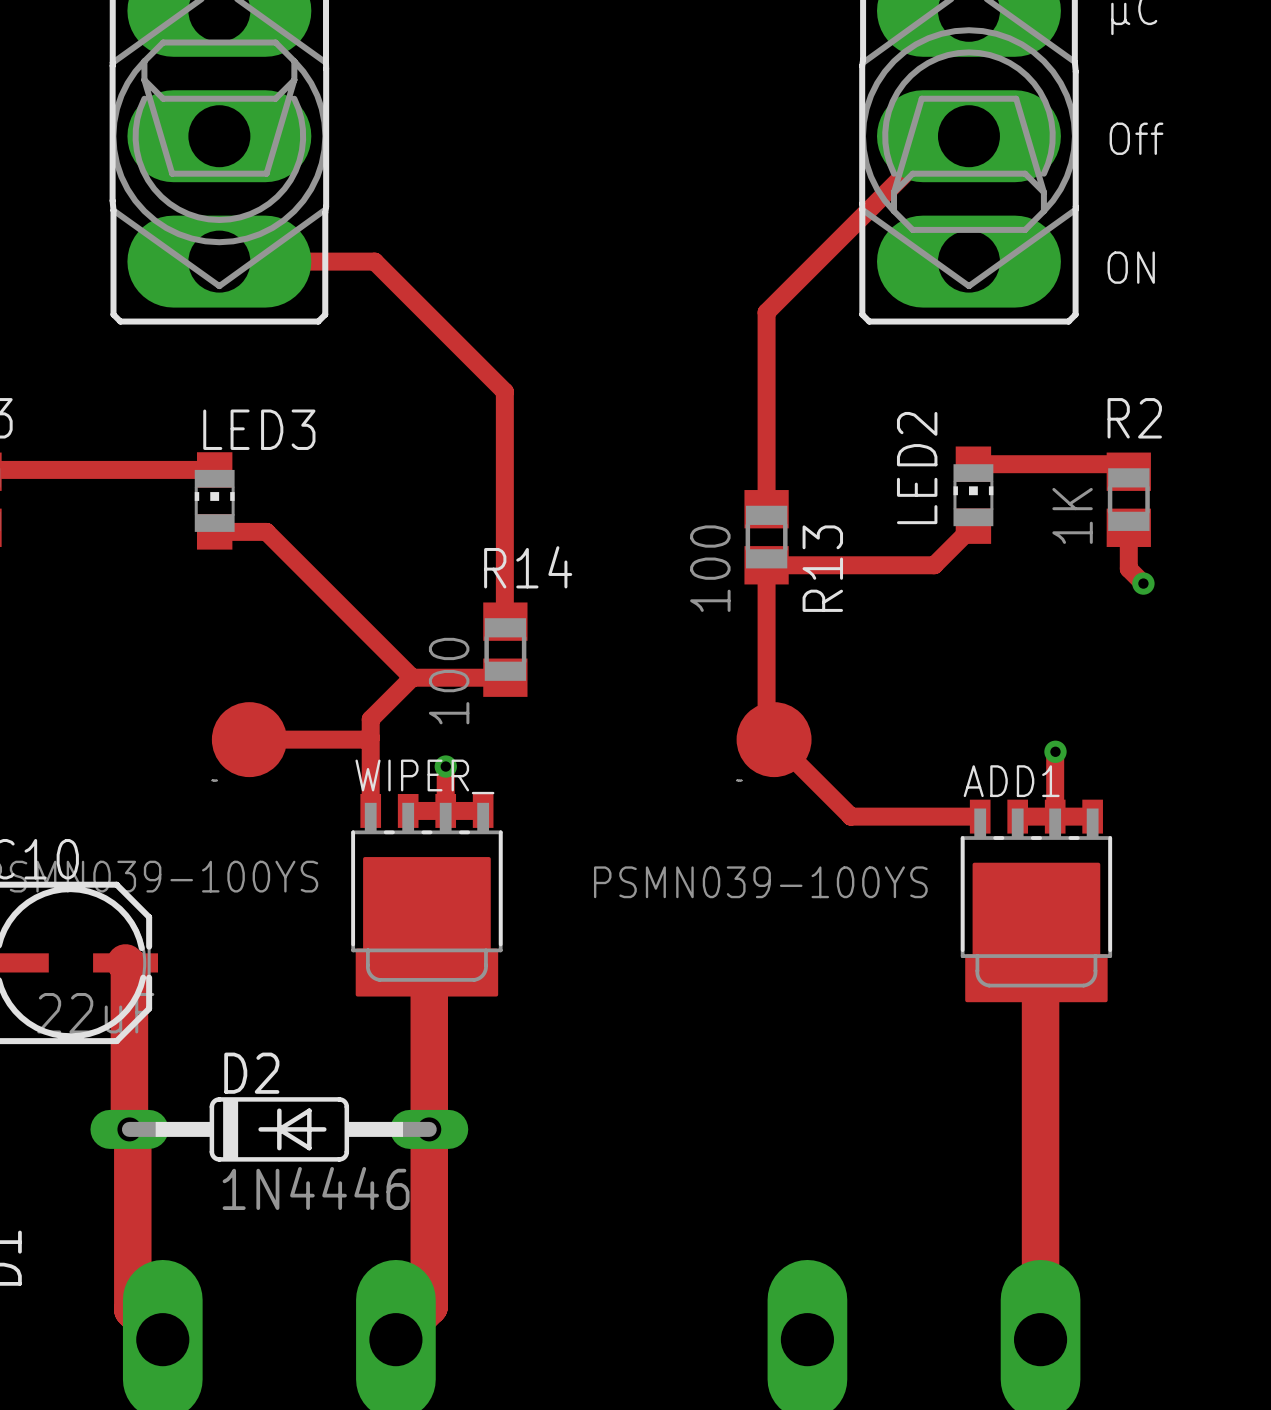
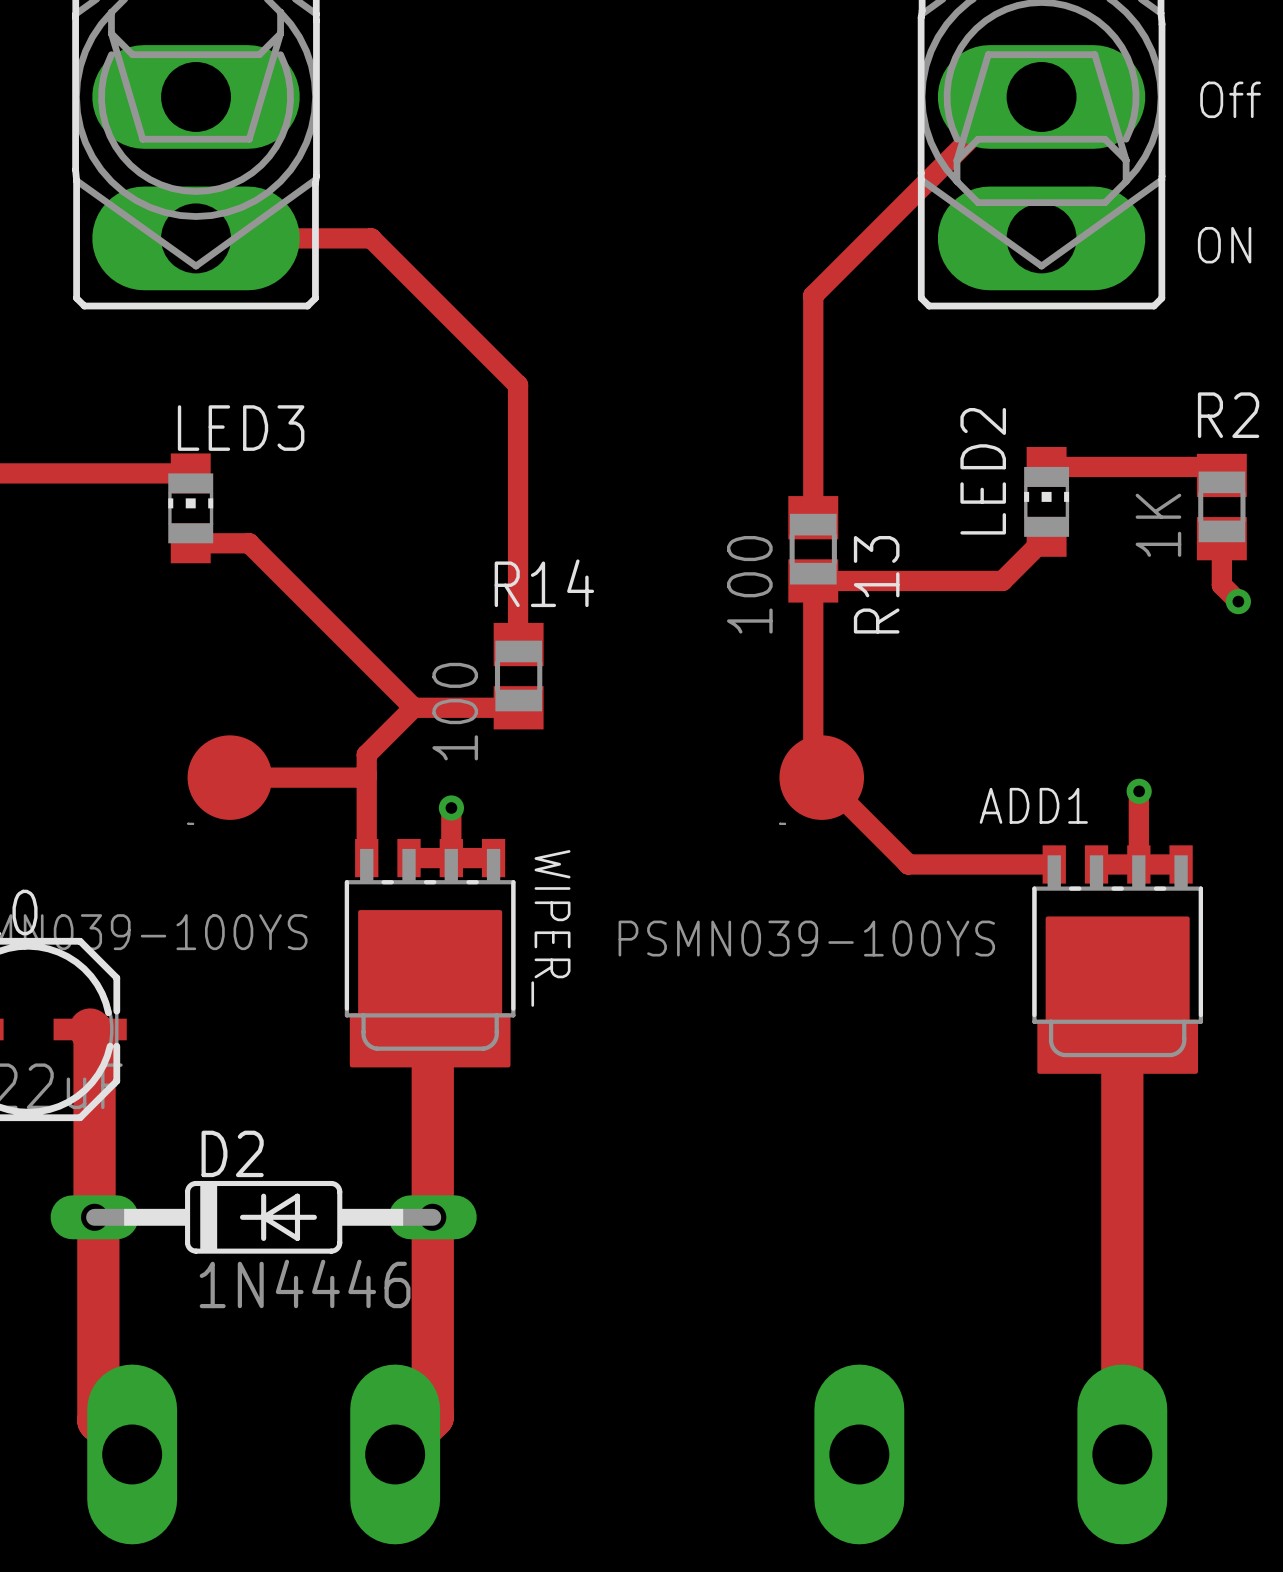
WIPER_ name rotation: 0° (424, 776) -> 90° clockwise (550, 928)
ADD1 name position: ADD1 (1011, 781) -> ADD1 (1033, 805)

